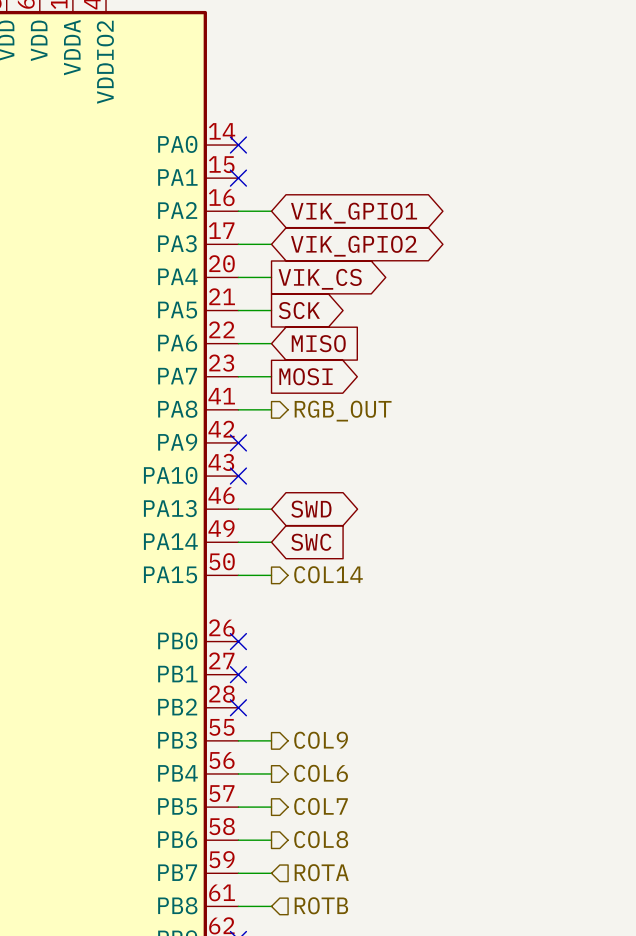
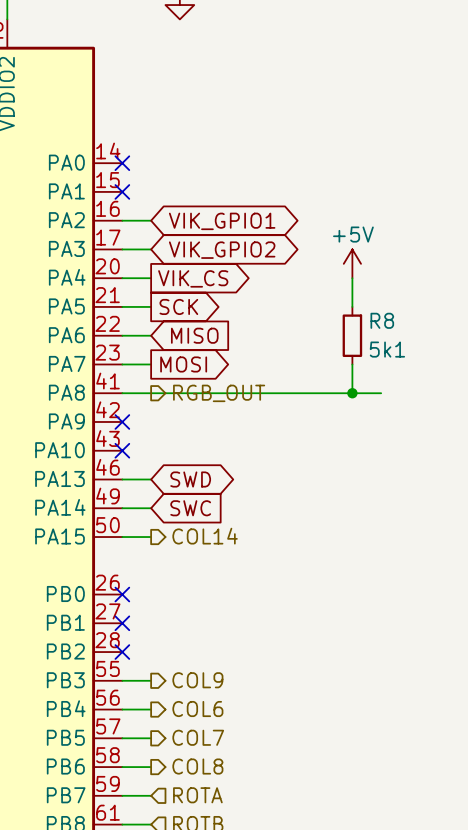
power symbol: none -> +5V (352, 263)
wire: none -> (352, 278) (352, 306)
R8: none -> 5k1 (352, 335)
wire: none -> (352, 364) (352, 393)
wire: none -> (151, 393) (381, 393)
junction: none -> (352, 393)

